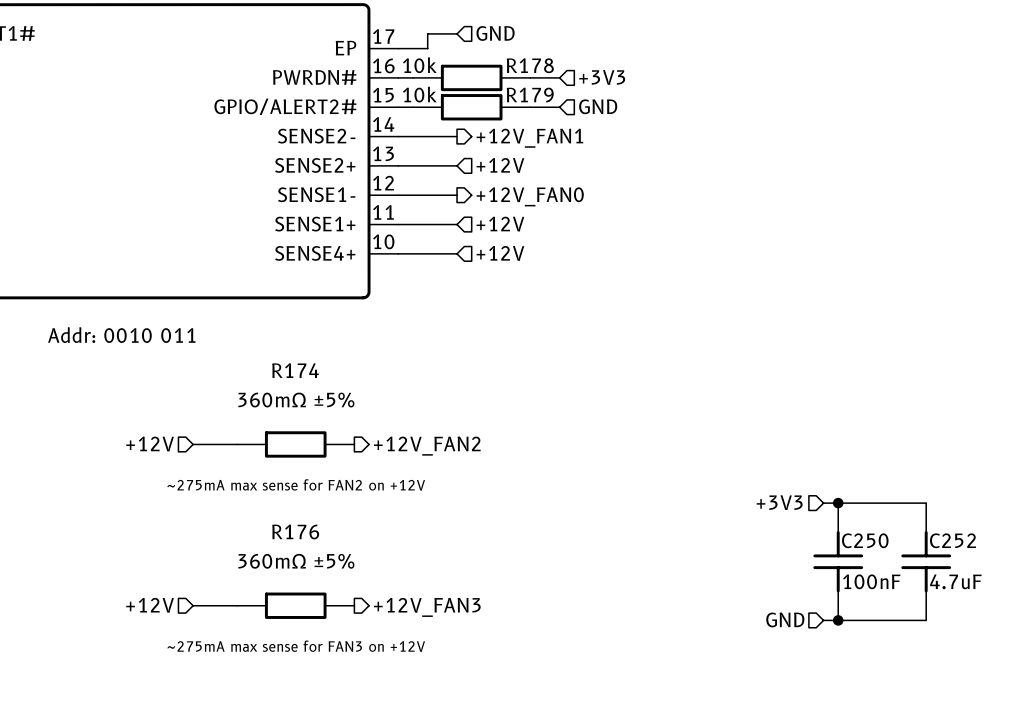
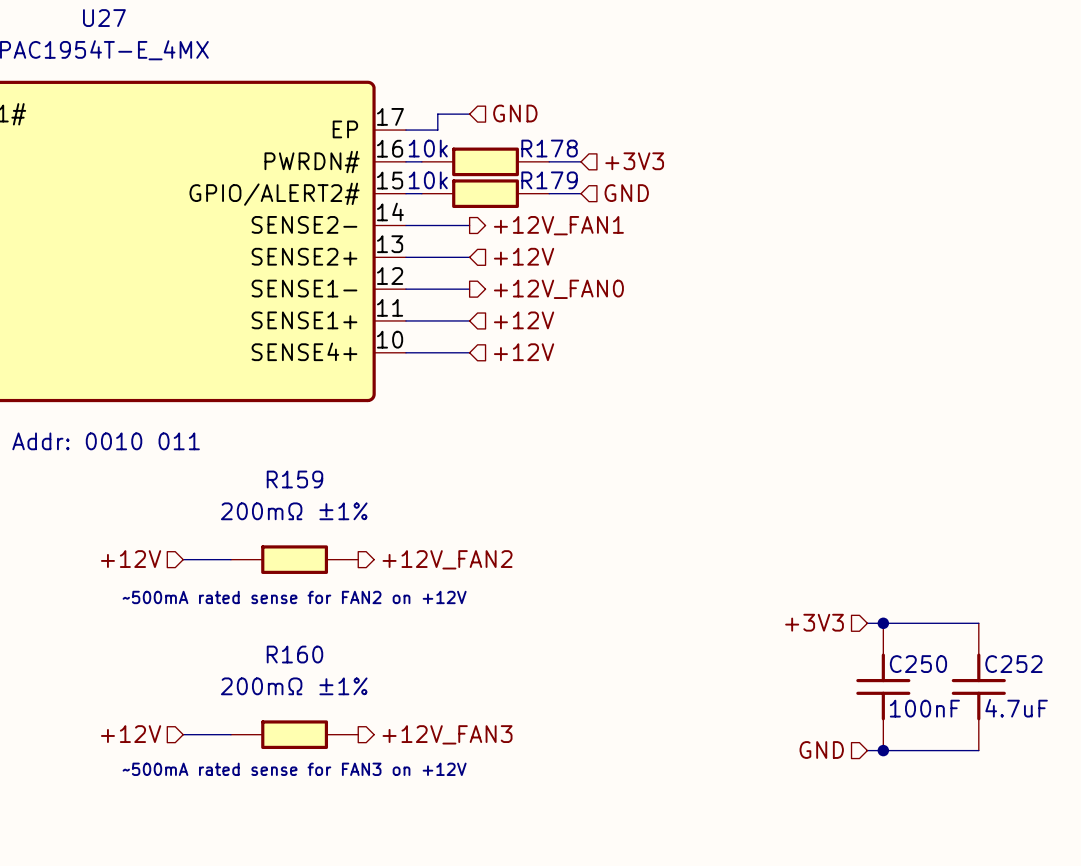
R174 name: R174 (295, 370) -> R159 (294, 479)
R174 value: 360mΩ ±5% (296, 400) -> 200mΩ ±1% (294, 511)
text: ~275mA max sense for FAN2 on +12V (296, 484) -> ~500mA rated sense for FAN2 on +12V (294, 597)
R176 name: R176 (295, 531) -> R160 (294, 654)
R176 value: 360mΩ ±5% (296, 561) -> 200mΩ ±1% (294, 686)
text: ~275mA max sense for FAN3 on +12V (296, 646) -> ~500mA rated sense for FAN3 on +12V (294, 769)

